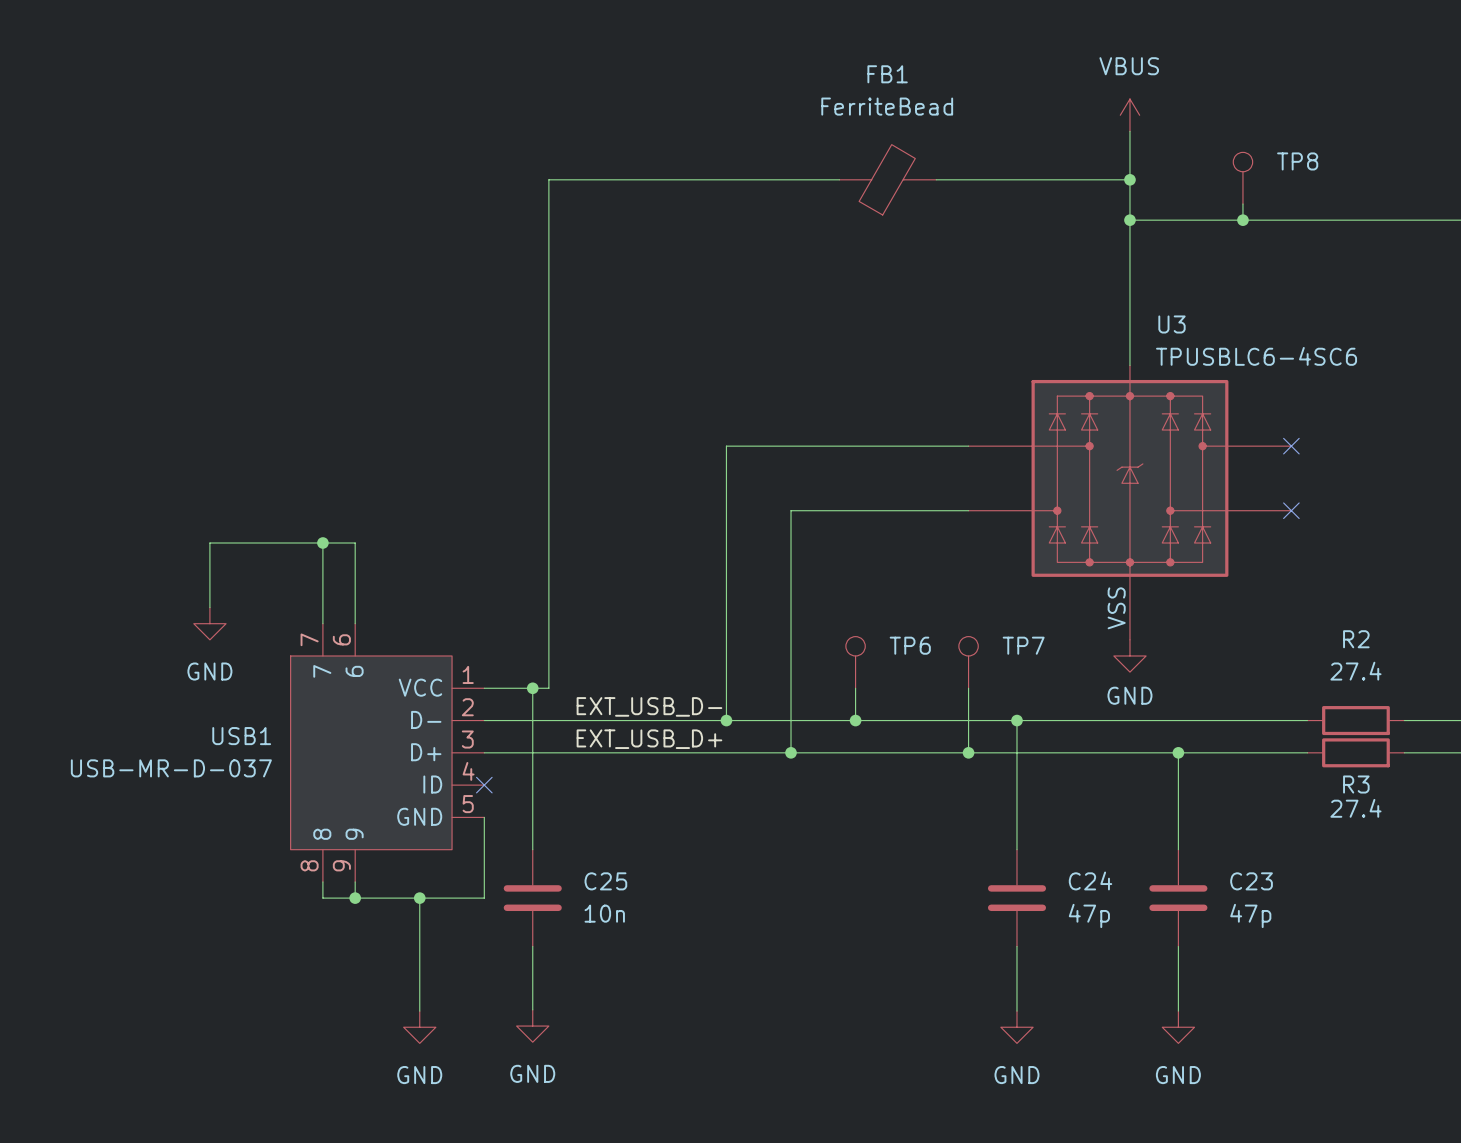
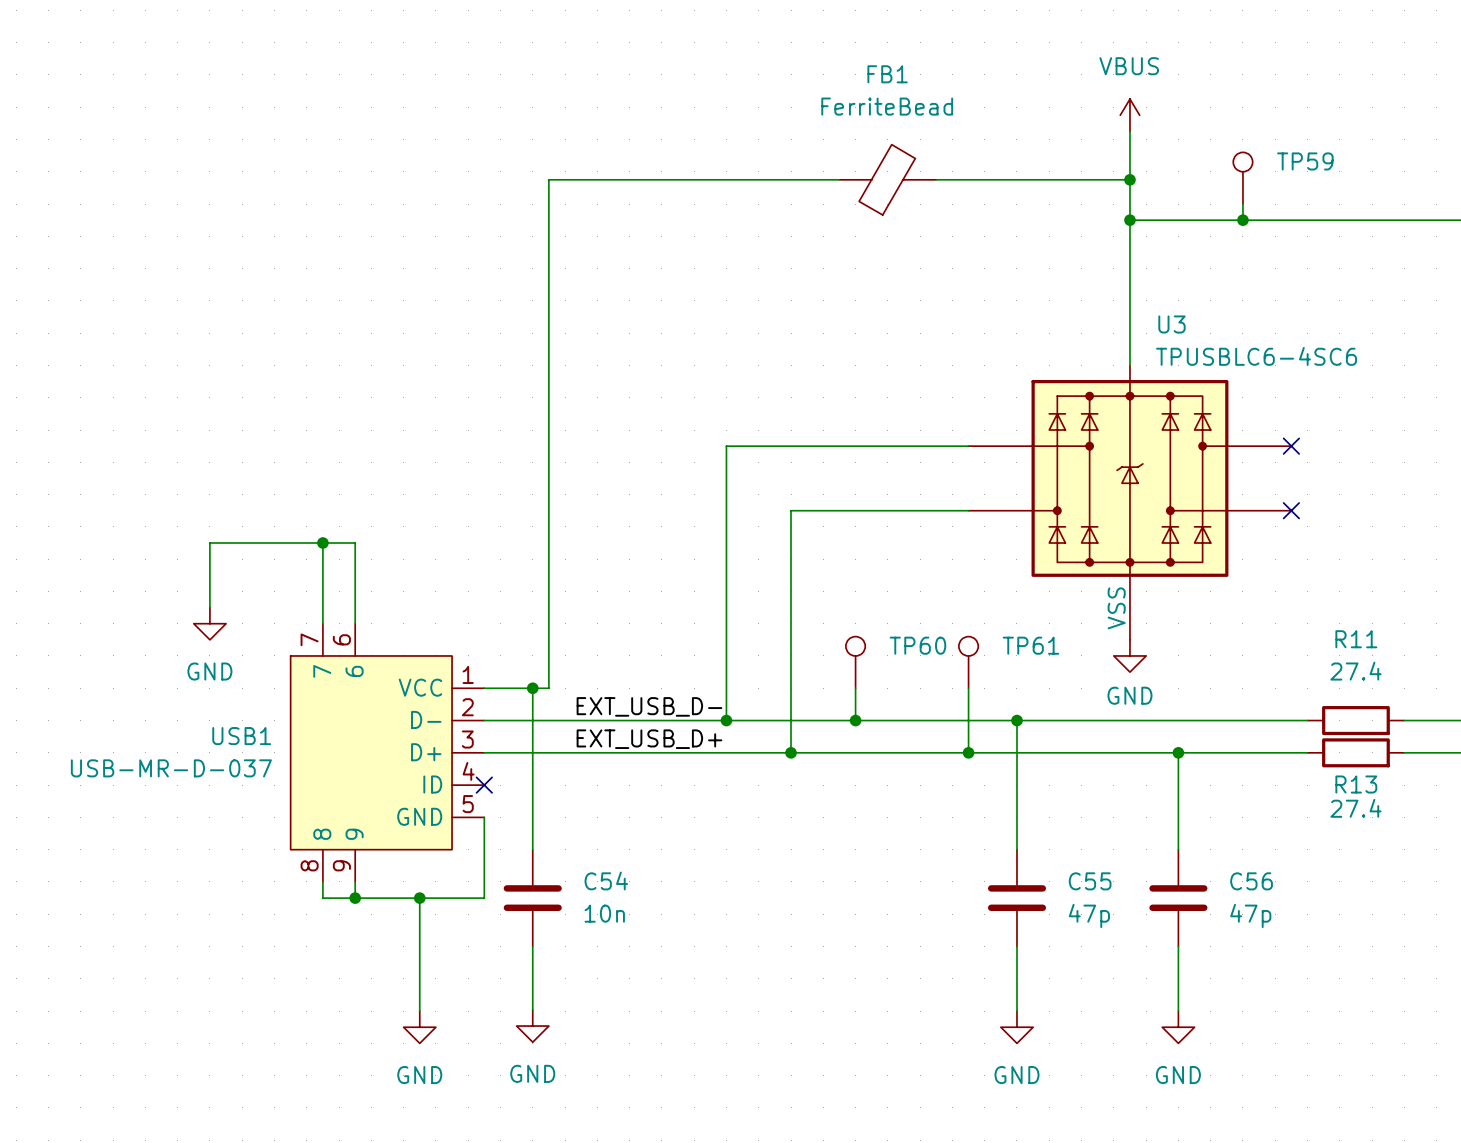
TP8 name: TP8 (1297, 161) -> TP59 (1305, 161)
R2 name: R2 (1356, 639) -> R11 (1356, 639)
TP6 name: TP6 (910, 645) -> TP60 (917, 645)
TP7 name: TP7 (1023, 645) -> TP61 (1030, 645)
R3 name: R3 (1356, 784) -> R13 (1356, 784)
C24 name: C24 (1090, 880) -> C55 (1090, 881)
C25 name: C25 (605, 881) -> C54 (606, 880)
C23 name: C23 (1251, 881) -> C56 (1251, 881)

